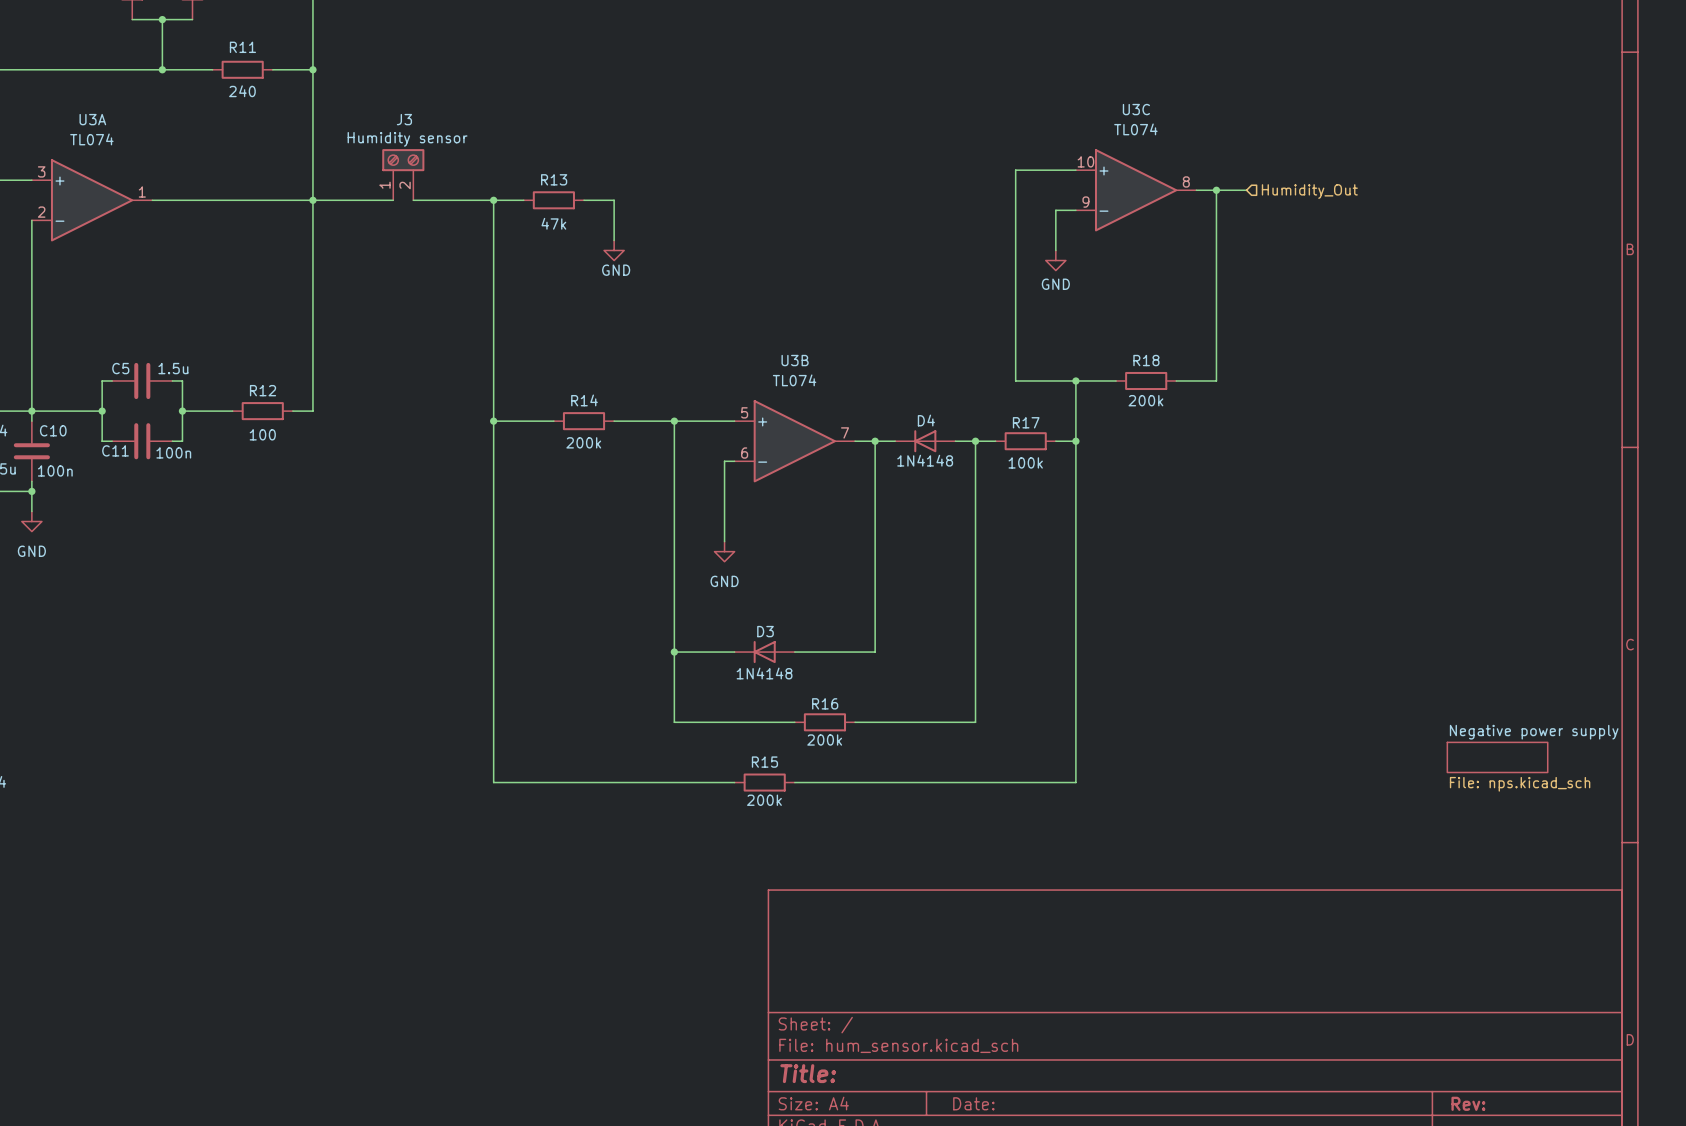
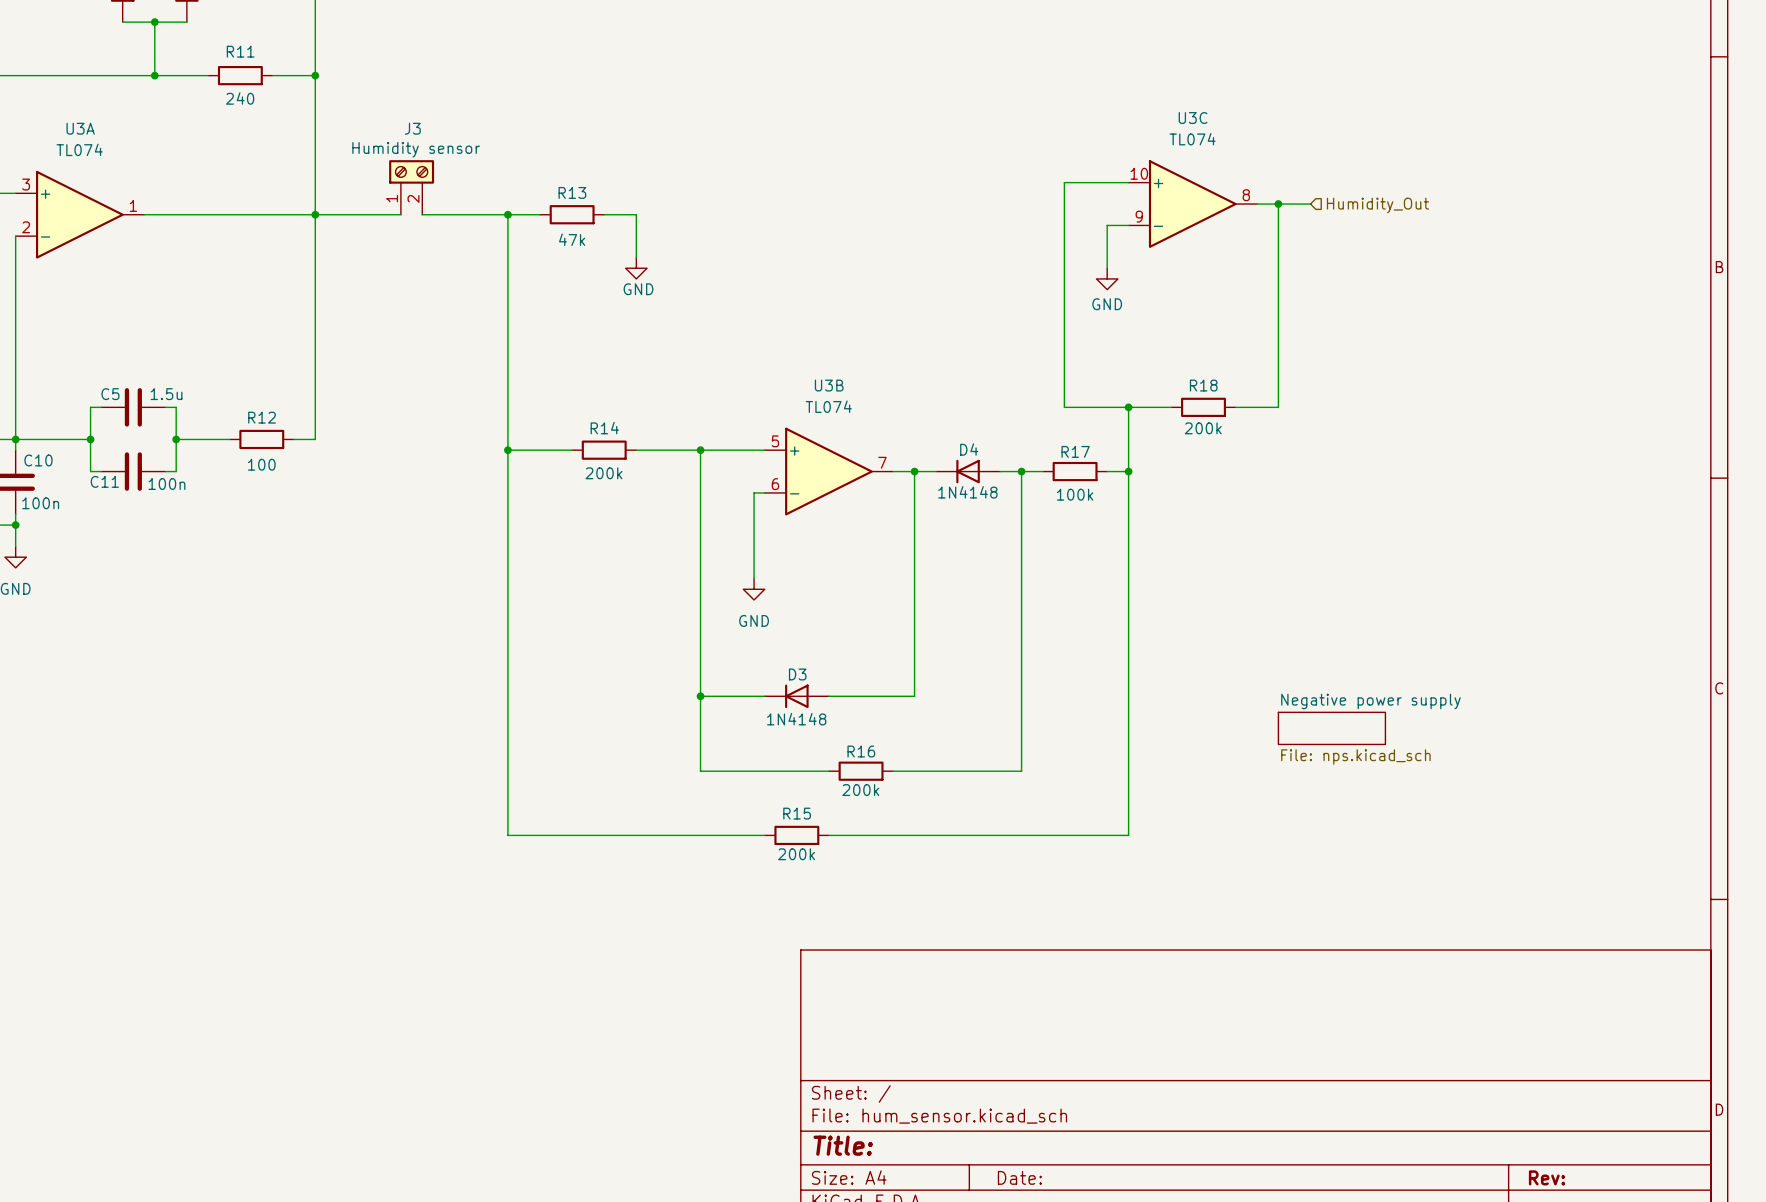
sheet Negative power supply: none -> File: nps.kicad_sch (1331, 728)
sheet Negative power supply: File: nps.kicad_sch (1497, 757) -> none

